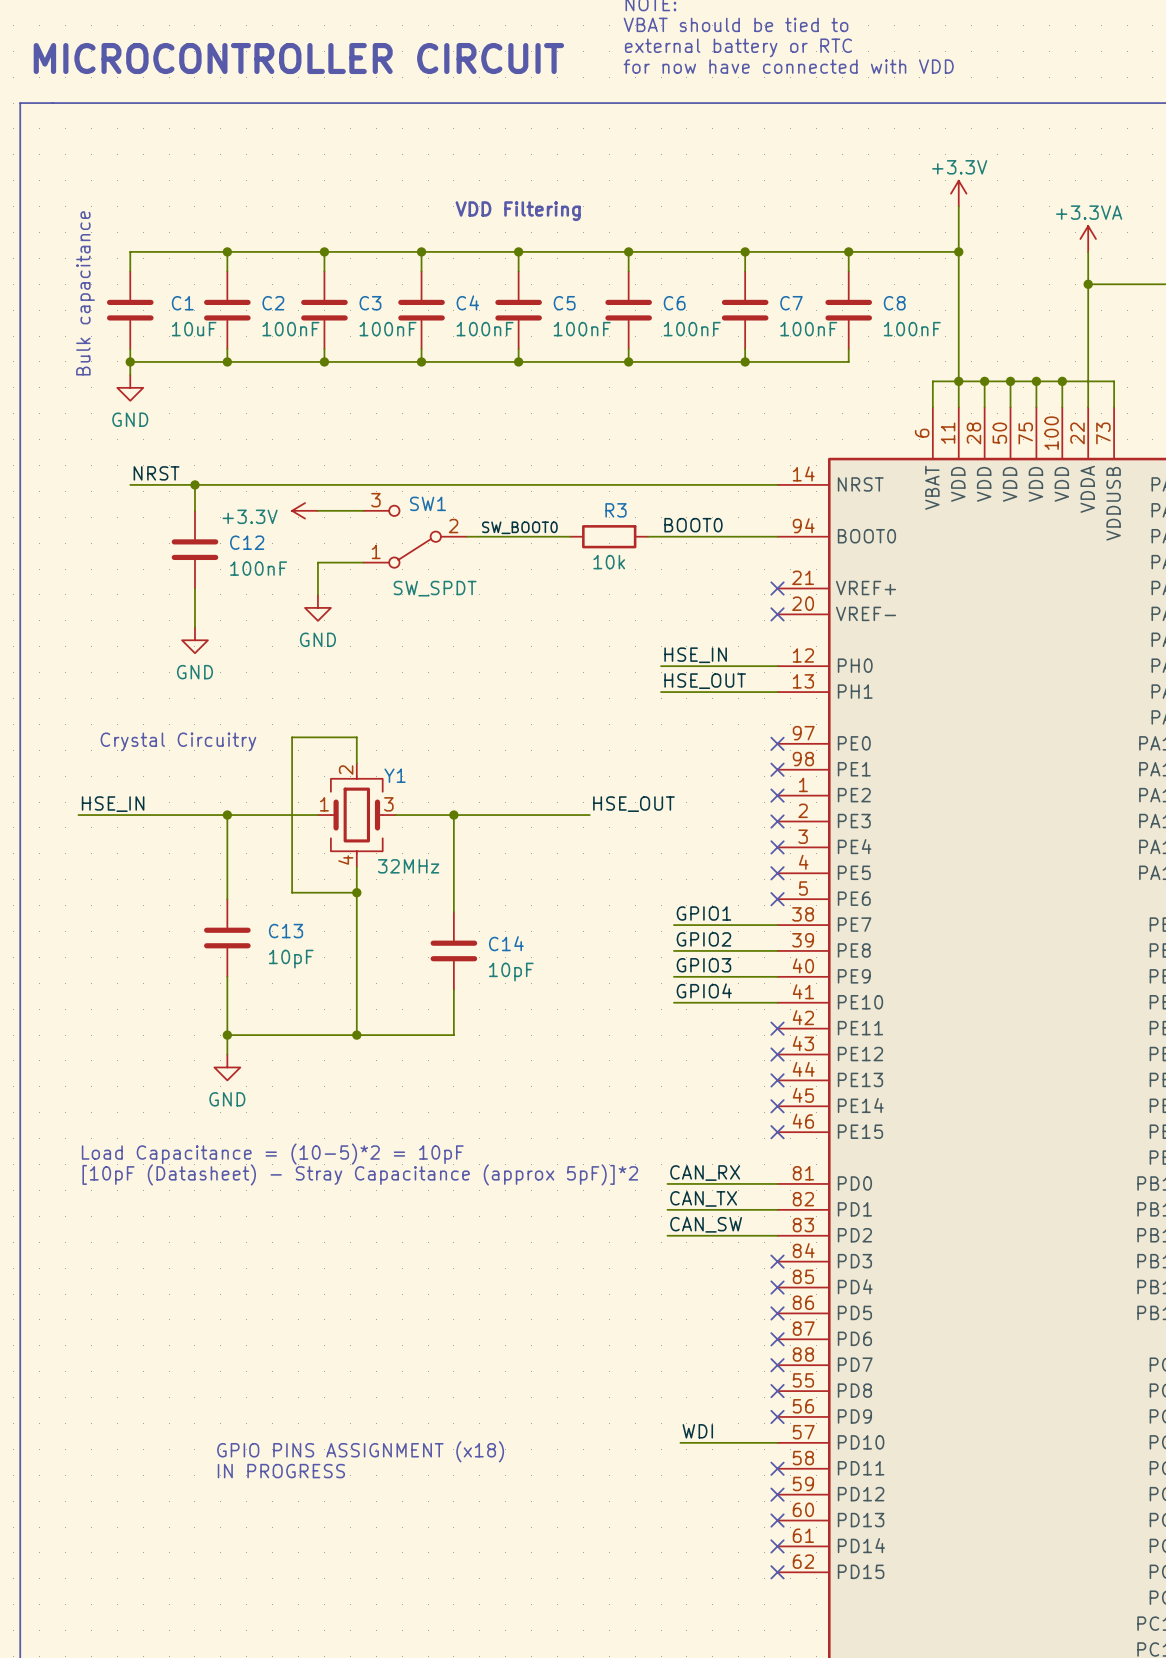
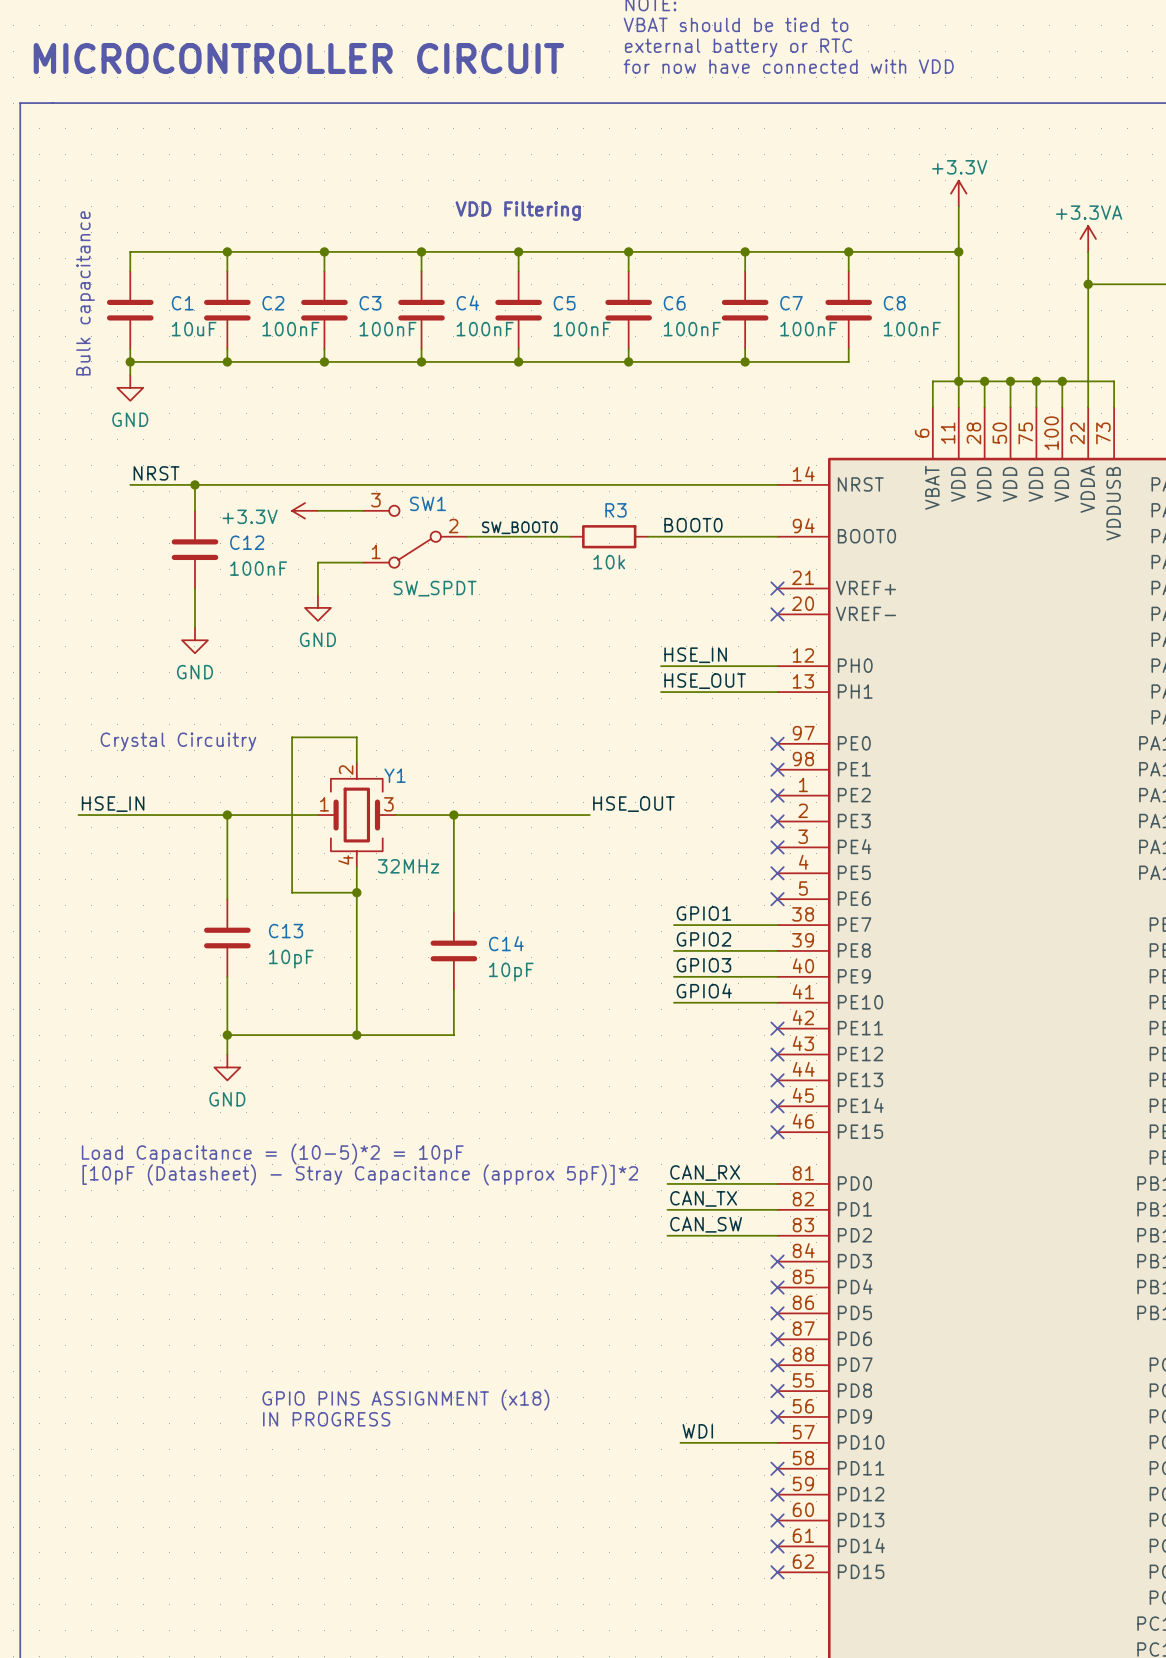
text position: GPIO PINS ASSIGNMENT (x18) (360, 1451) -> GPIO PINS ASSIGNMENT (x18) (405, 1400)
text position: IN PROGRESS (281, 1471) -> IN PROGRESS (326, 1419)

